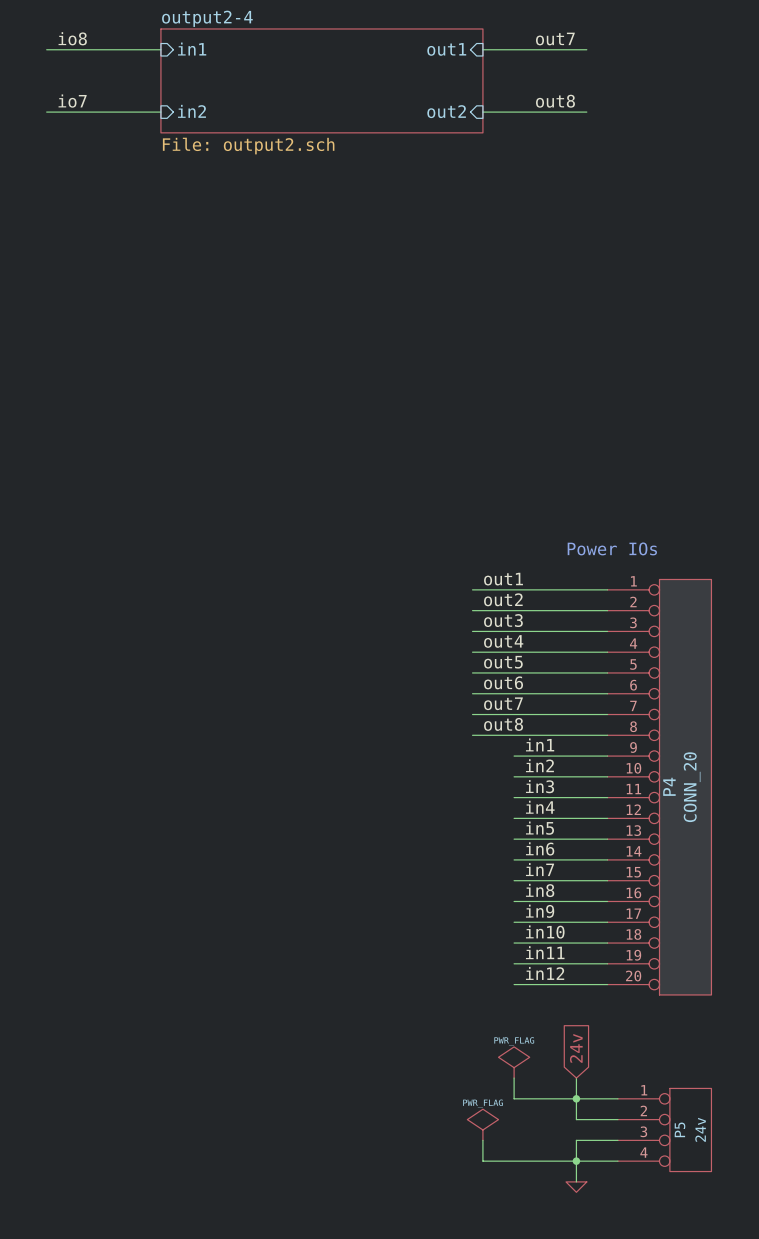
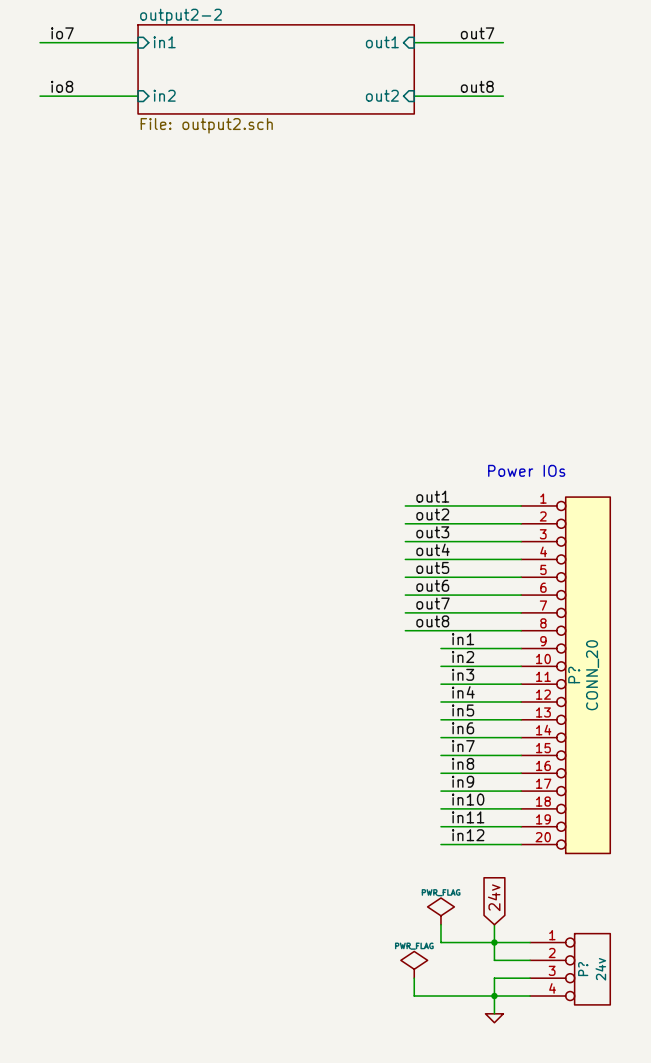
sheet output2-4 name: output2-4 (207, 18) -> output2-2 (181, 16)
label: io8 (72, 38) -> io7 (62, 33)
label: io7 (72, 101) -> io8 (62, 86)
P4 name: P4 (669, 786) -> P? (574, 675)
P5 name: P5 (680, 1129) -> P? (583, 969)

